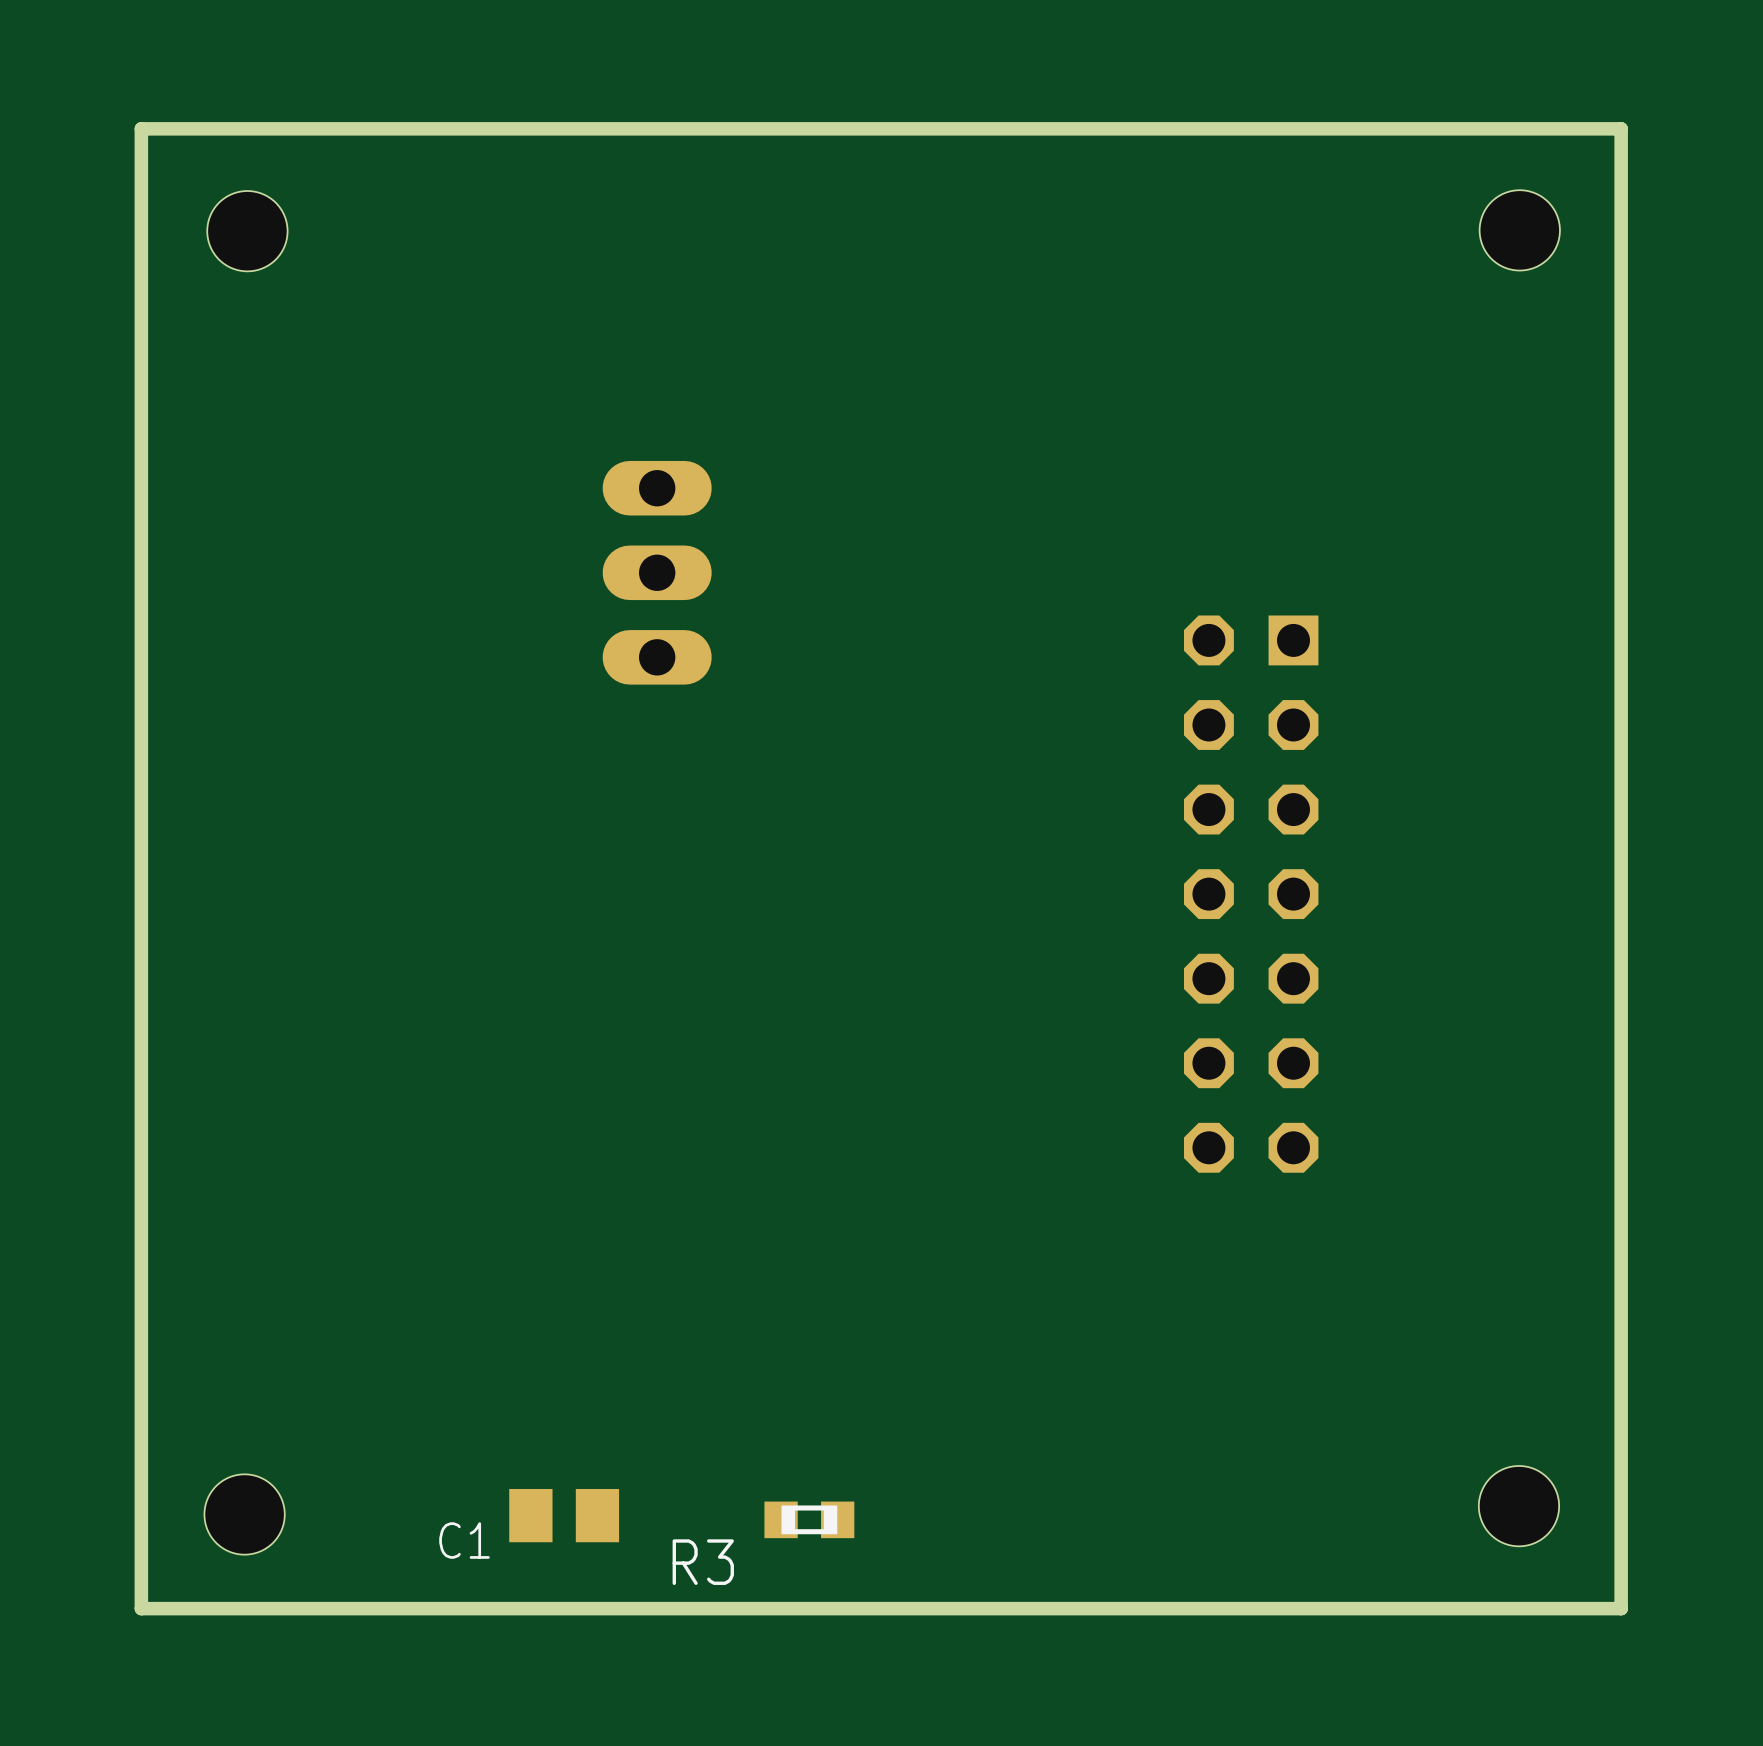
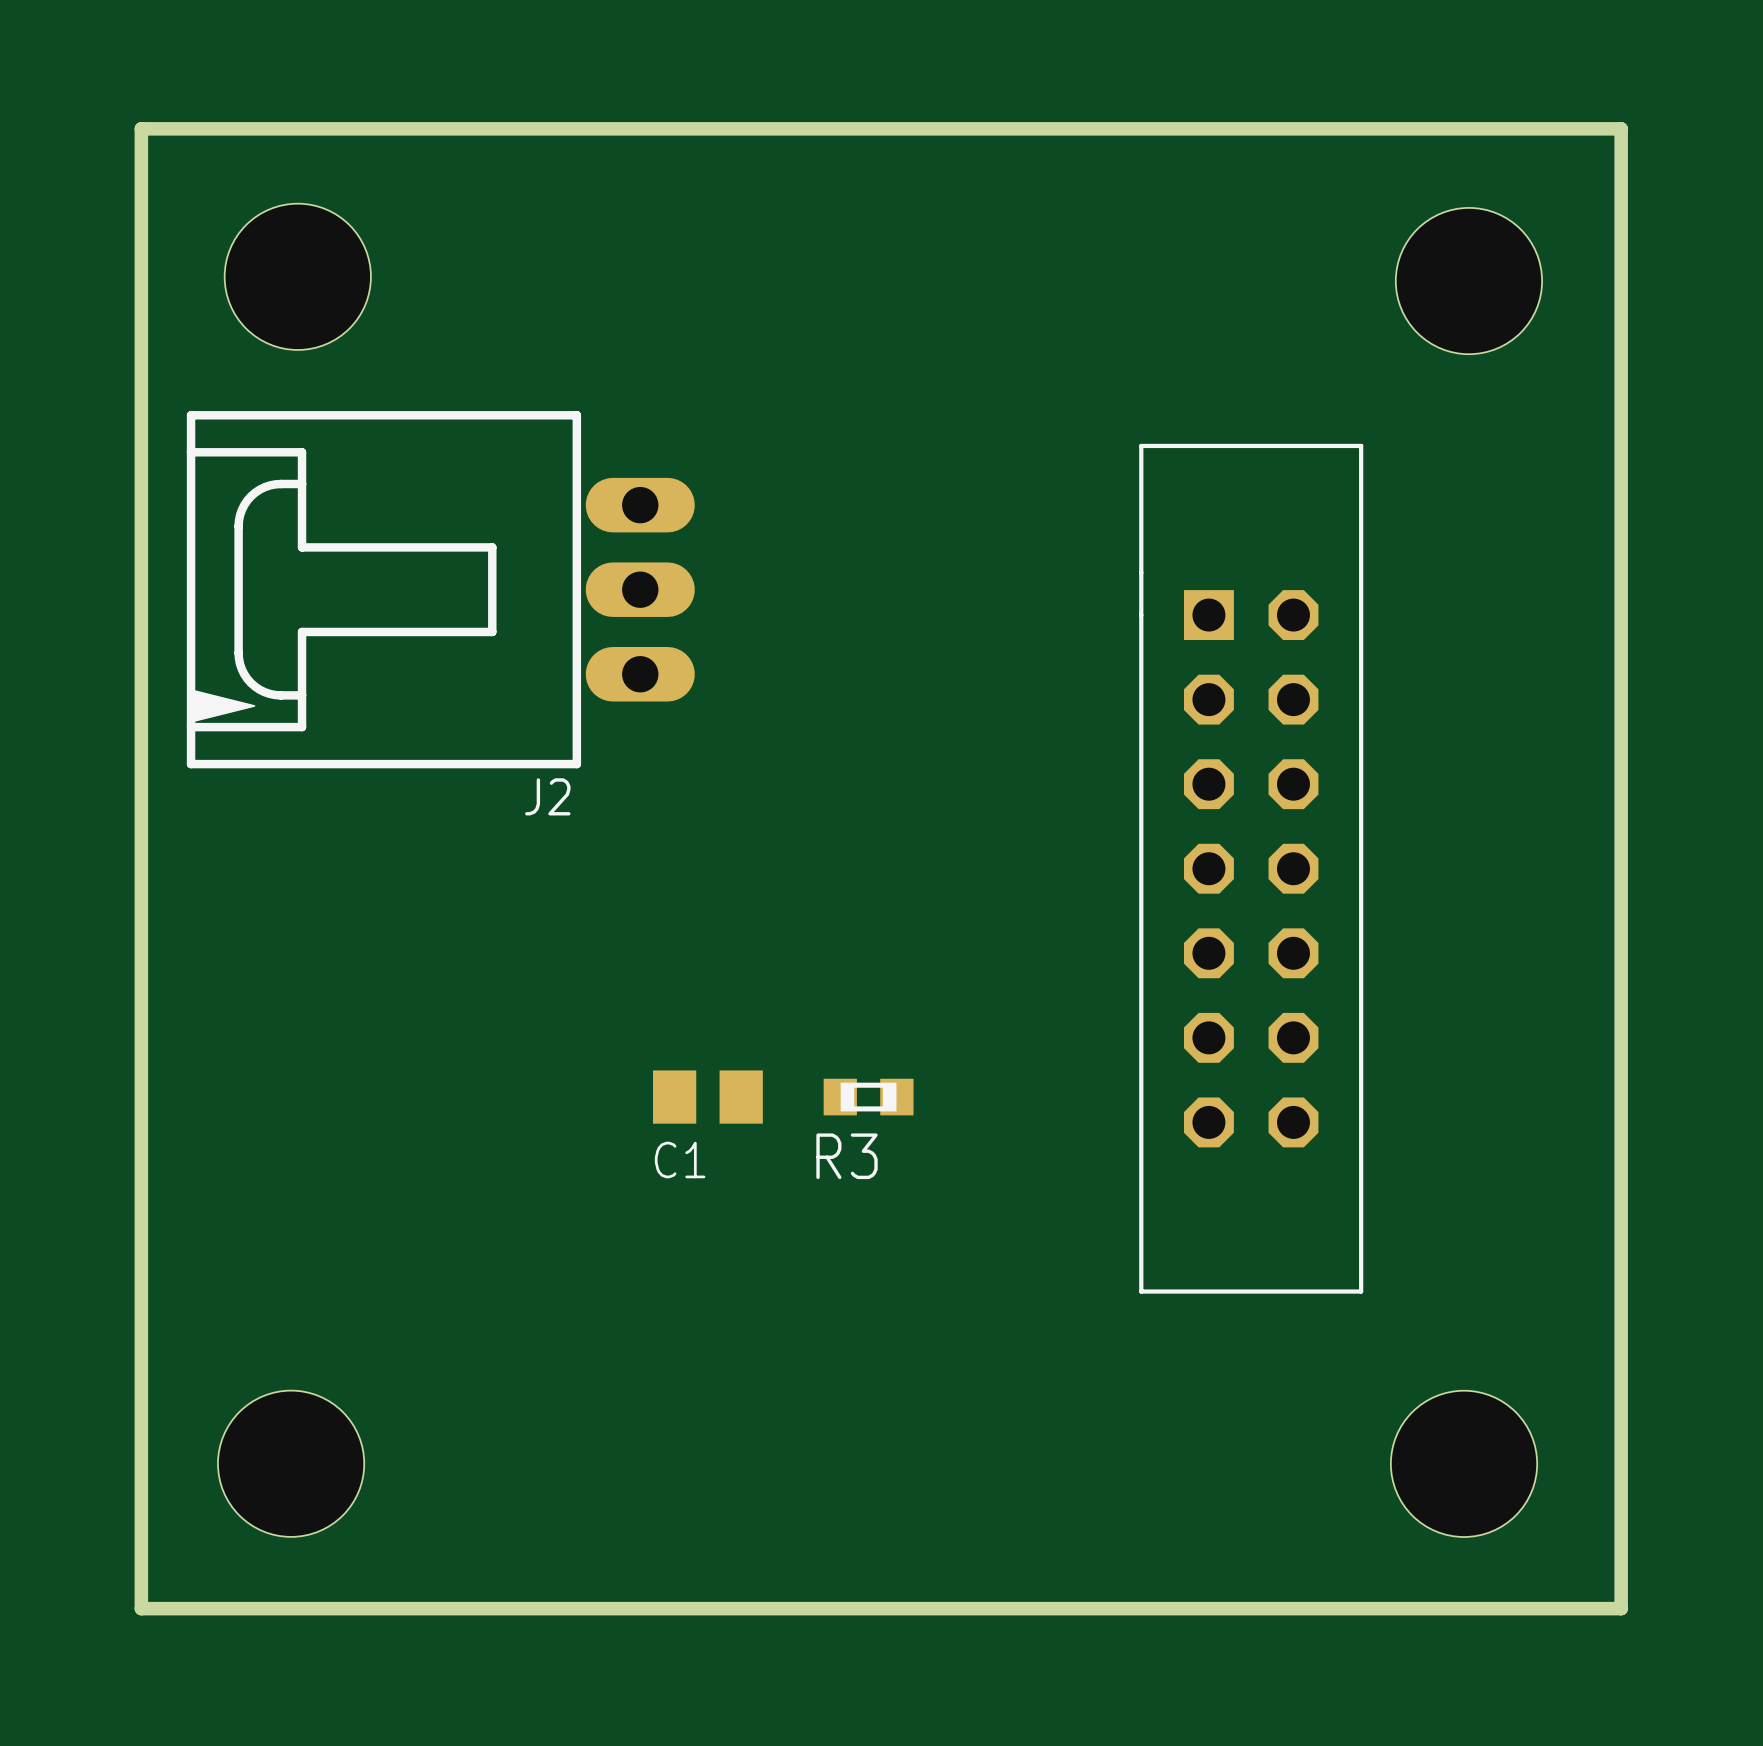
hole: (1519, 230) -> none
hole: (247, 231) -> none
hole: none -> (297, 276)
hole: none -> (1468, 281)
J2 side: top (657, 572) -> bottom (440, 589)
part side: top (1251, 894) -> bottom (1251, 868)
hole: none -> (291, 1463)
hole: none -> (1464, 1463)
hole: (1518, 1506) -> none
hole: (244, 1514) -> none
C1 position: (564, 1515) -> (707, 1097)
R3 position: (809, 1519) -> (868, 1097)
C1 name position: C1 (464, 1540) -> C1 (680, 1160)
R3 name position: R3 (703, 1562) -> R3 (847, 1156)

